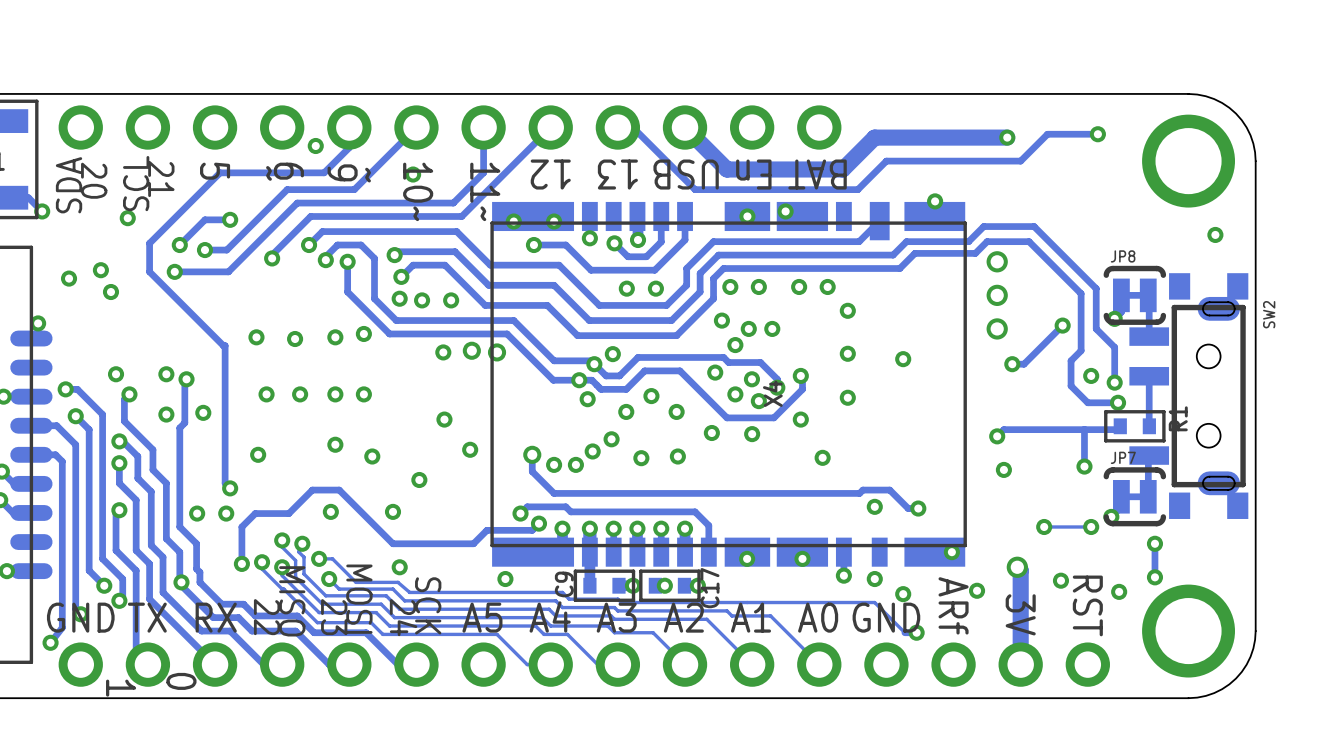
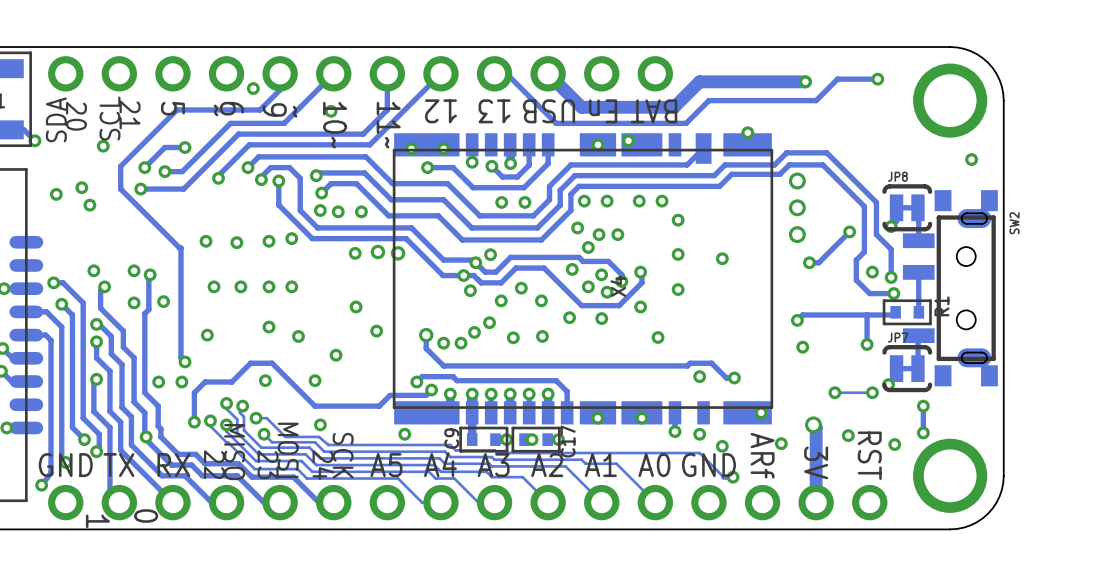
via: (38, 323) -> none

